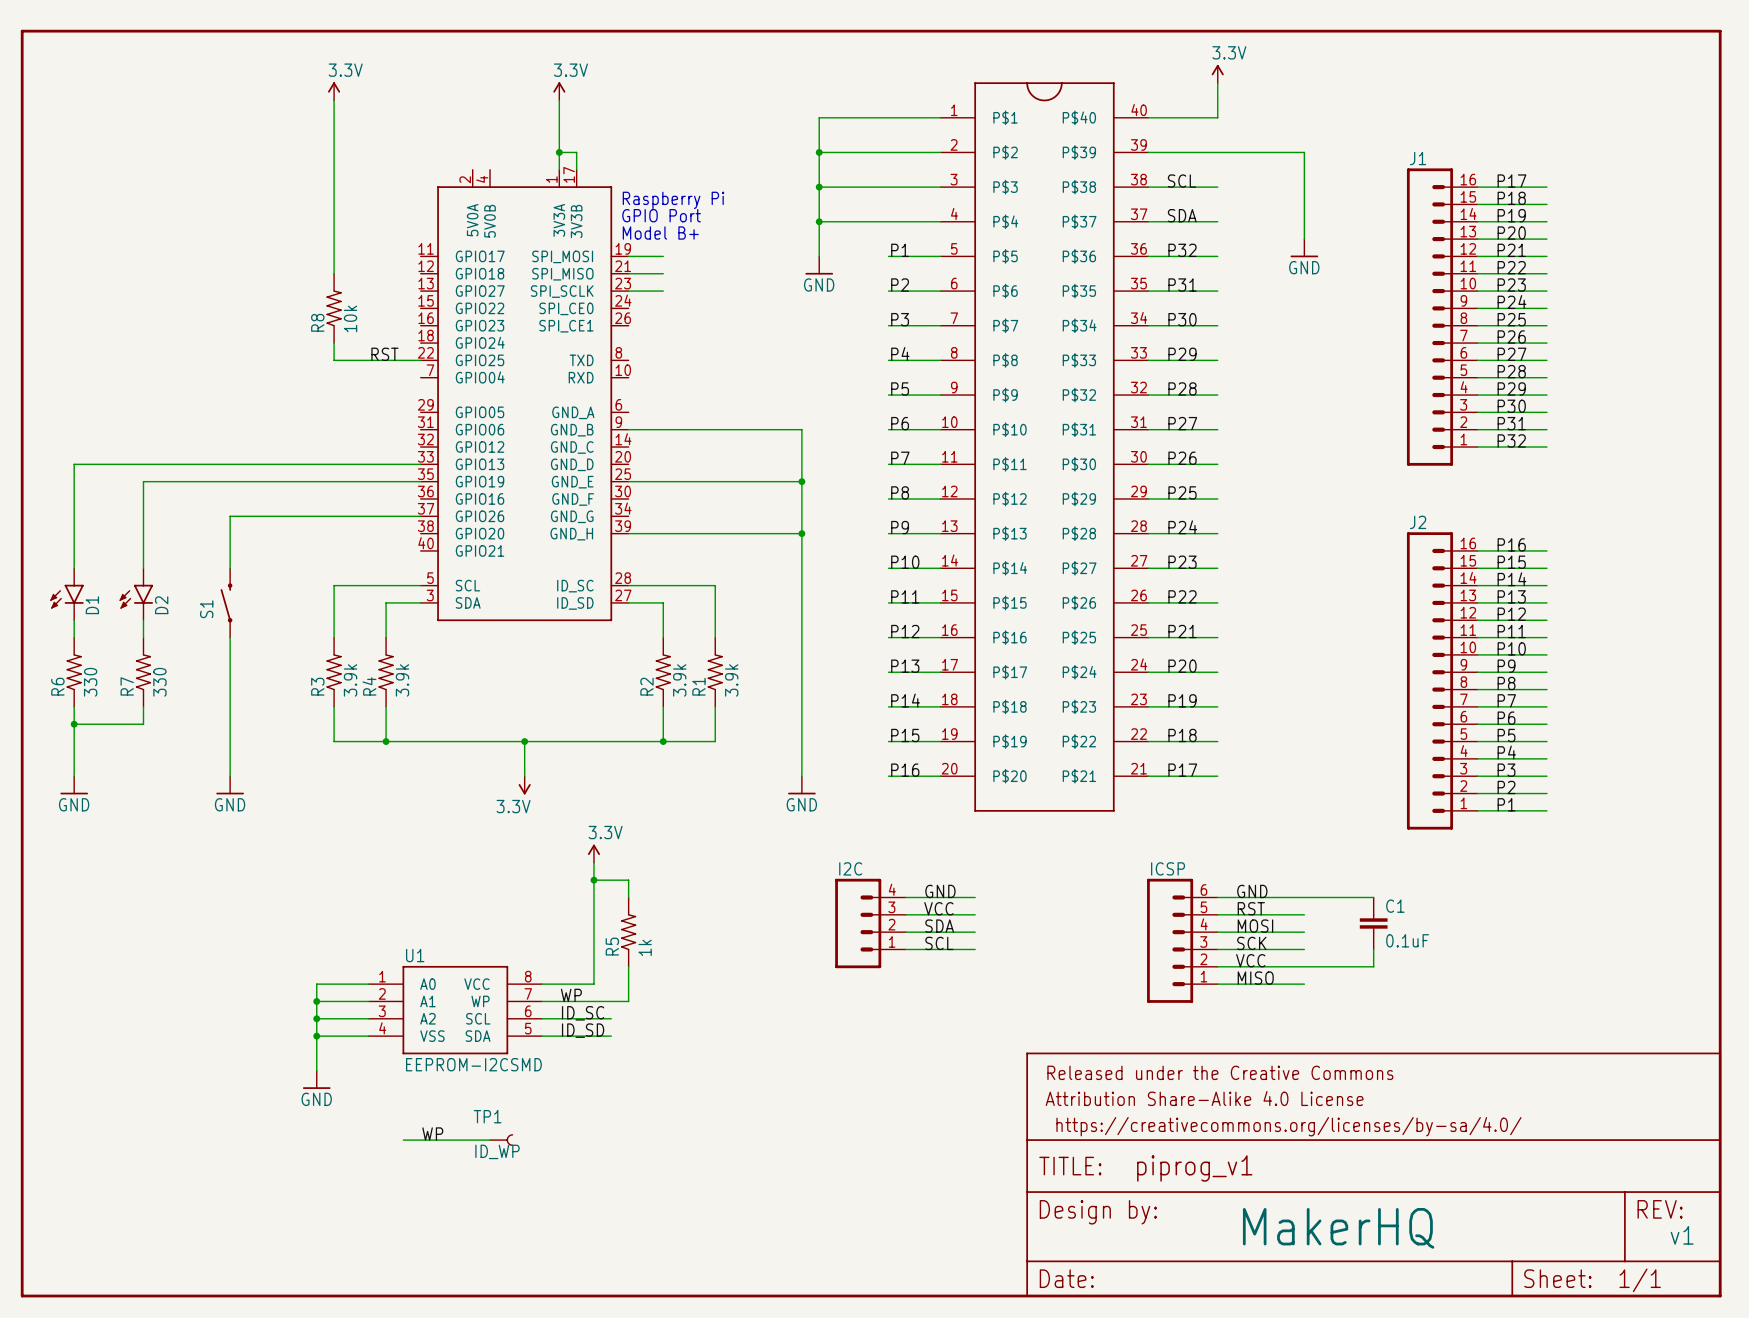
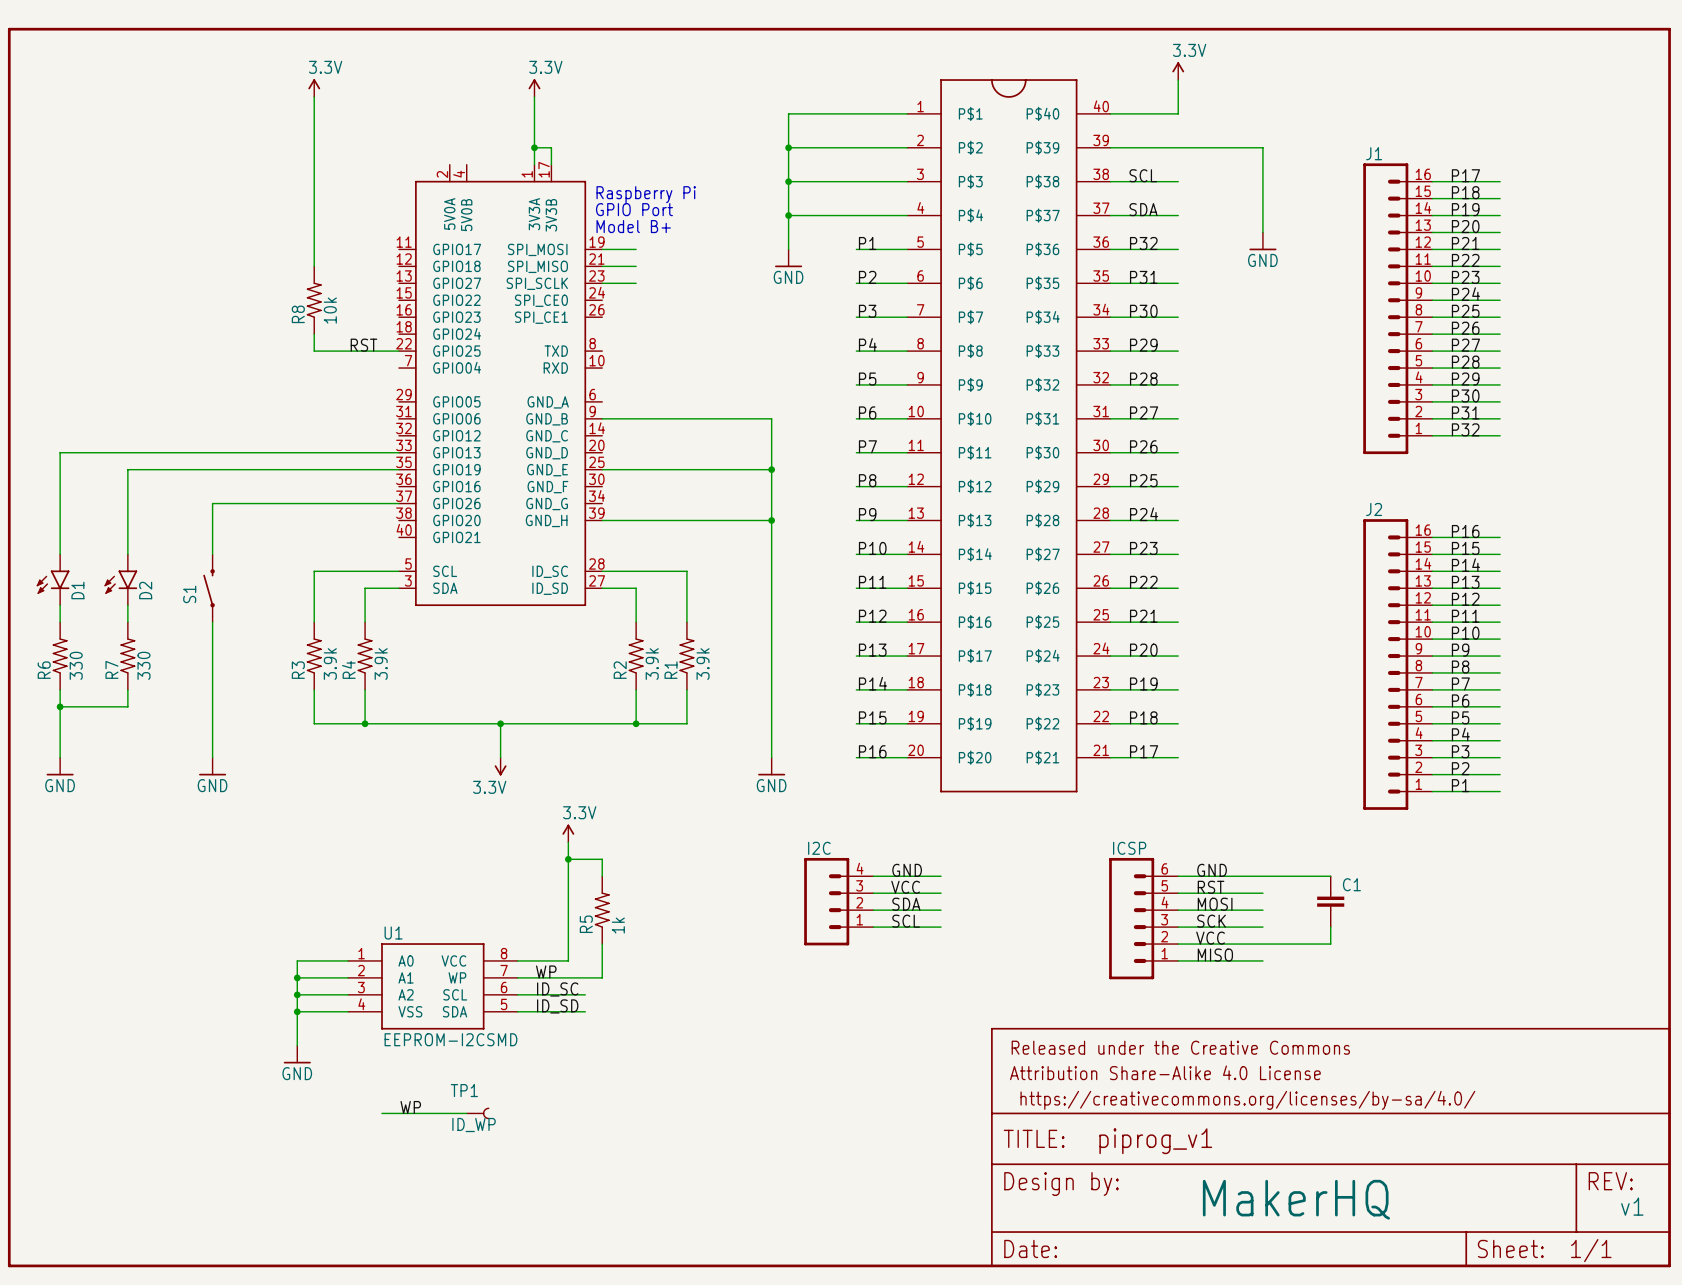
C1 value: 0.1uF (1407, 940) -> none

